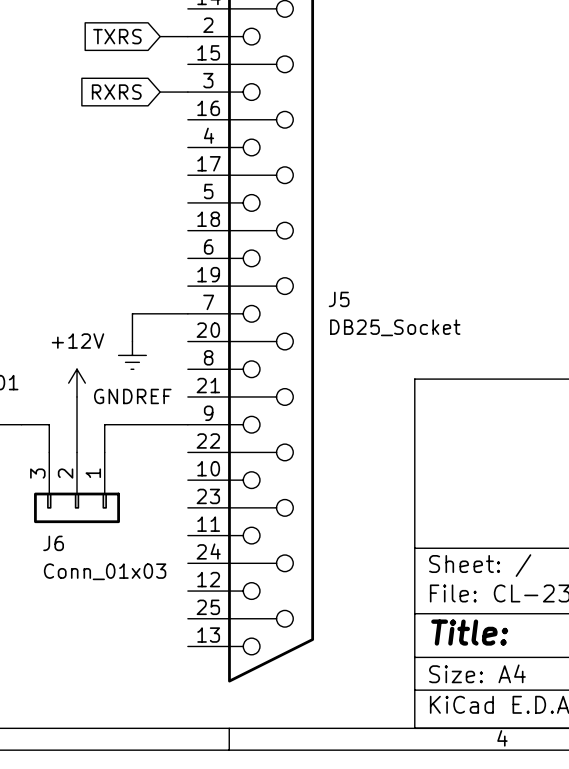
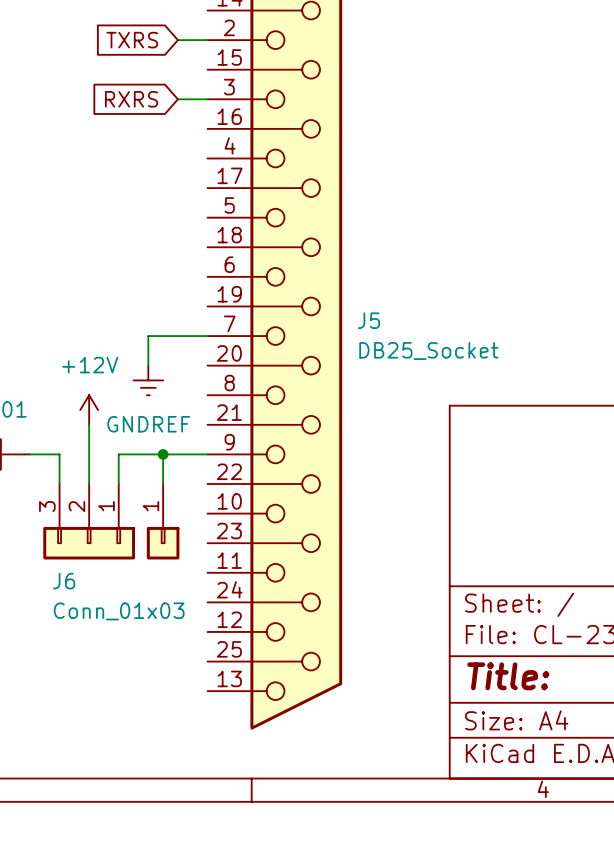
wire: none -> (163, 454) (163, 484)
junction: none -> (163, 454)
part: none -> (163, 521)

